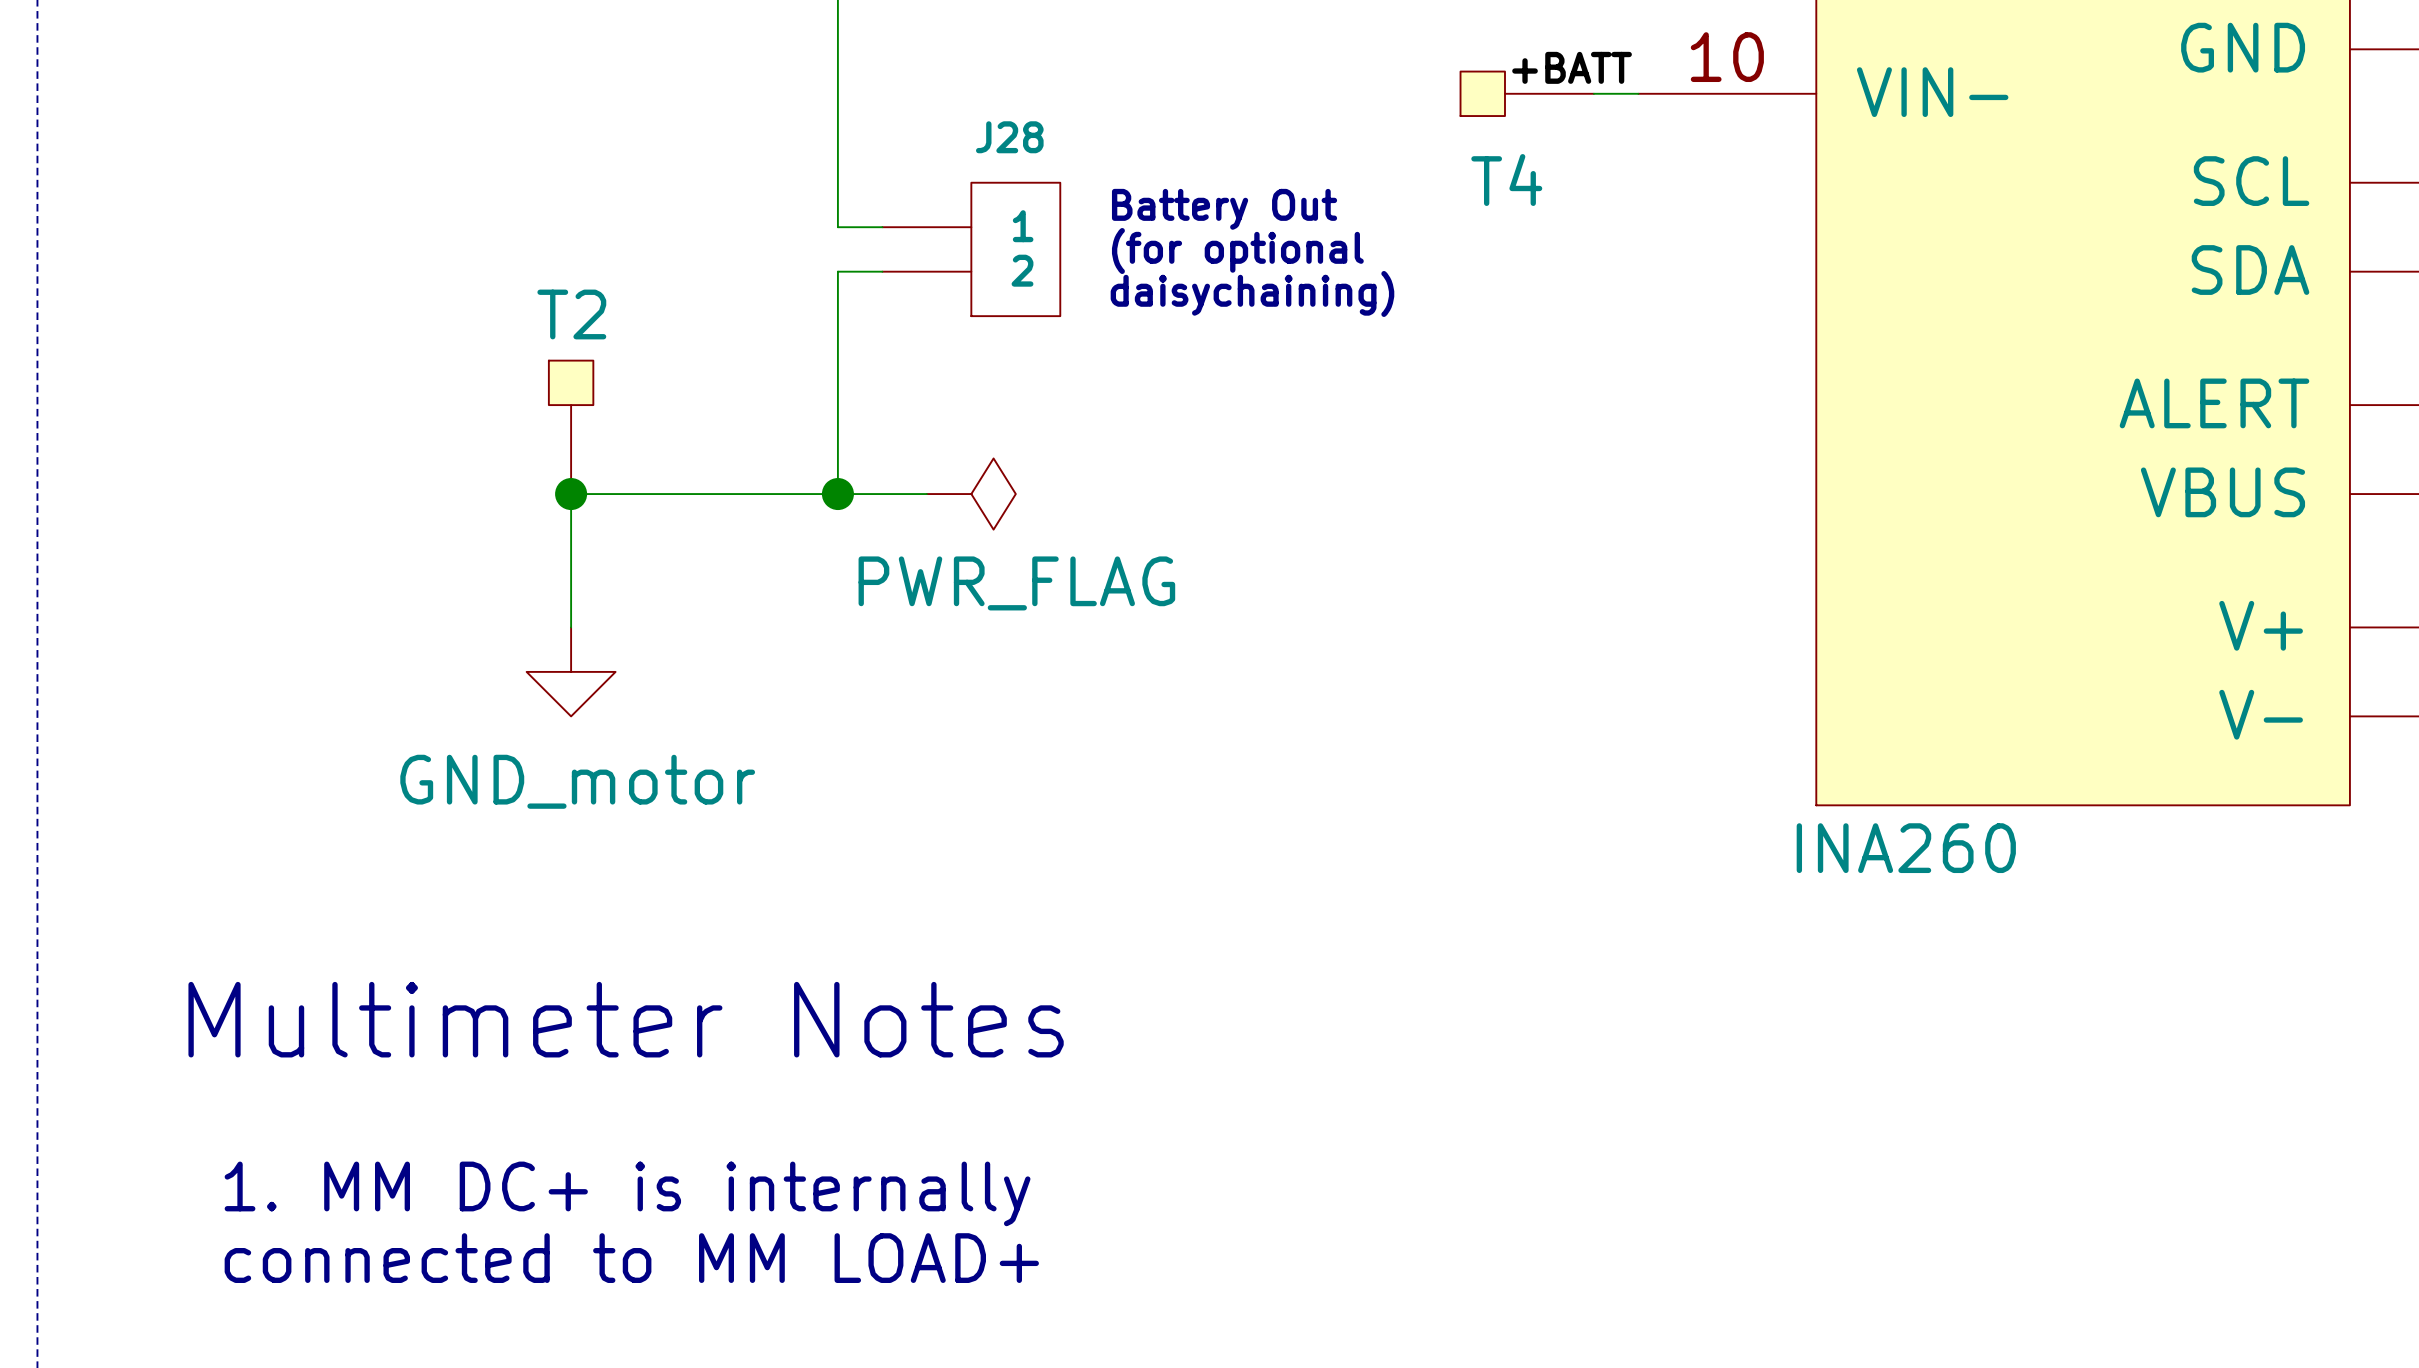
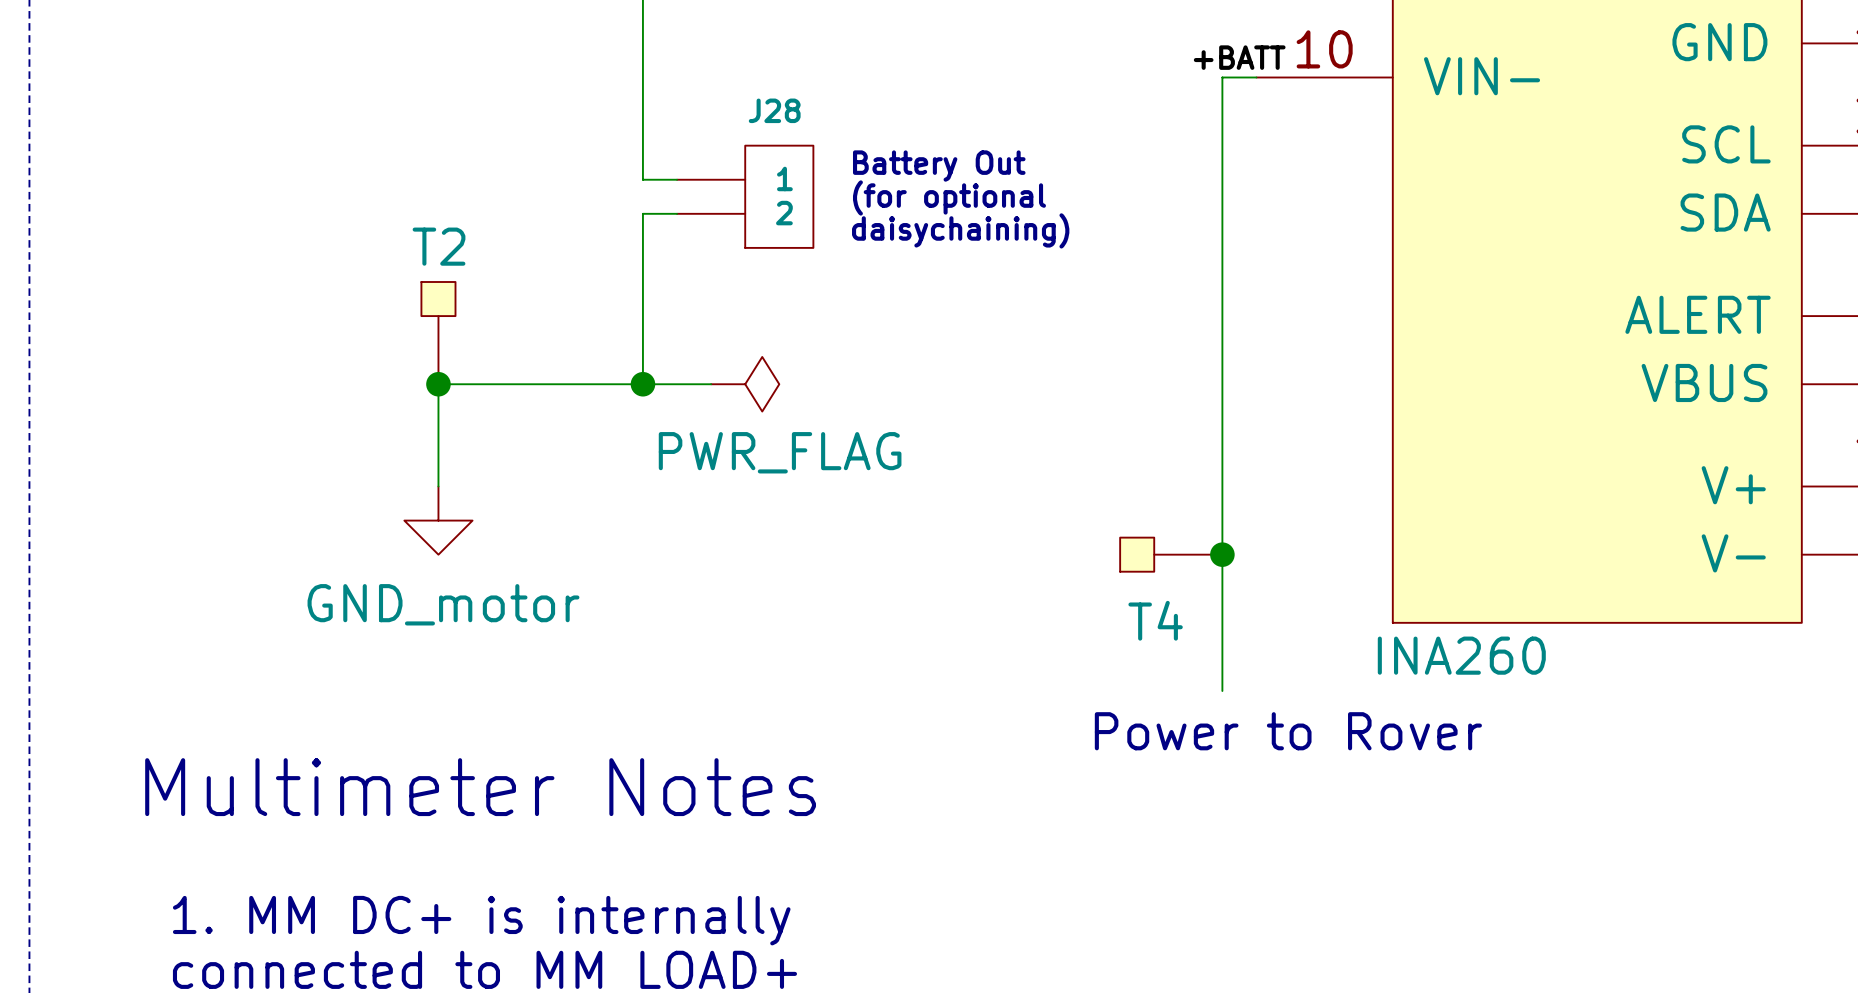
label position: +BATT (1572, 67) -> +BATT (1239, 57)
T4 position: (1527, 93) -> (1171, 554)
wire: none -> (1222, 77) (1222, 691)
junction: none -> (1222, 554)
text: none -> Power to Rover (1288, 731)

